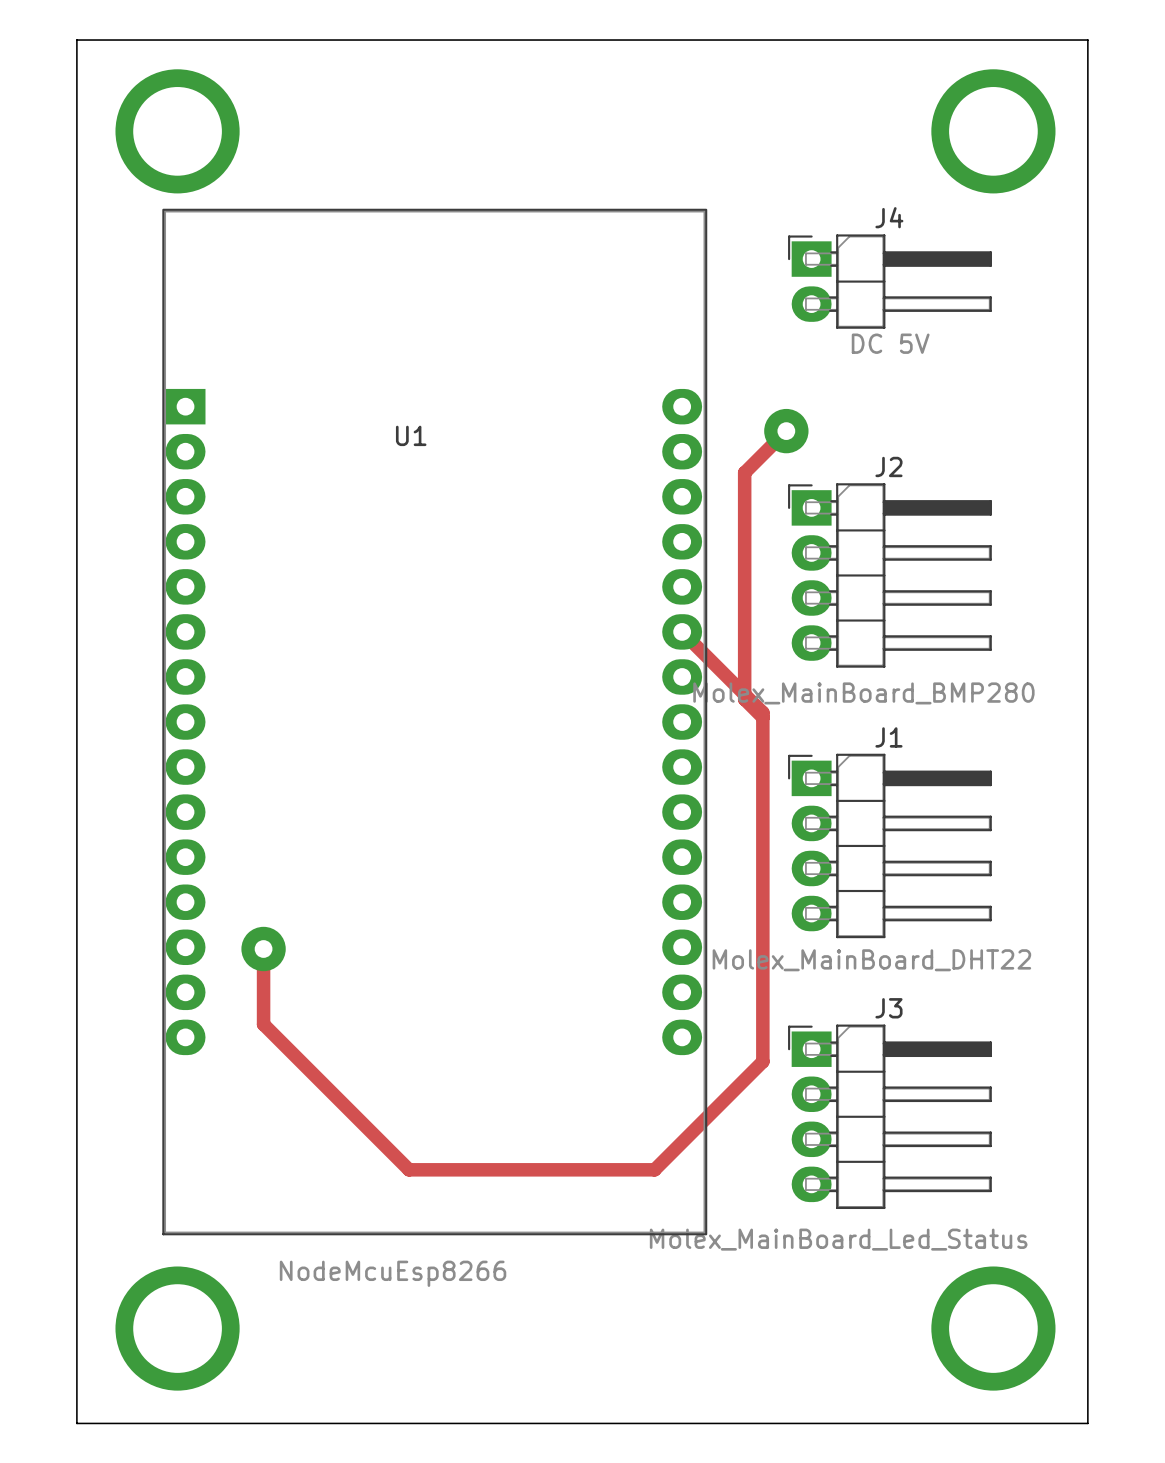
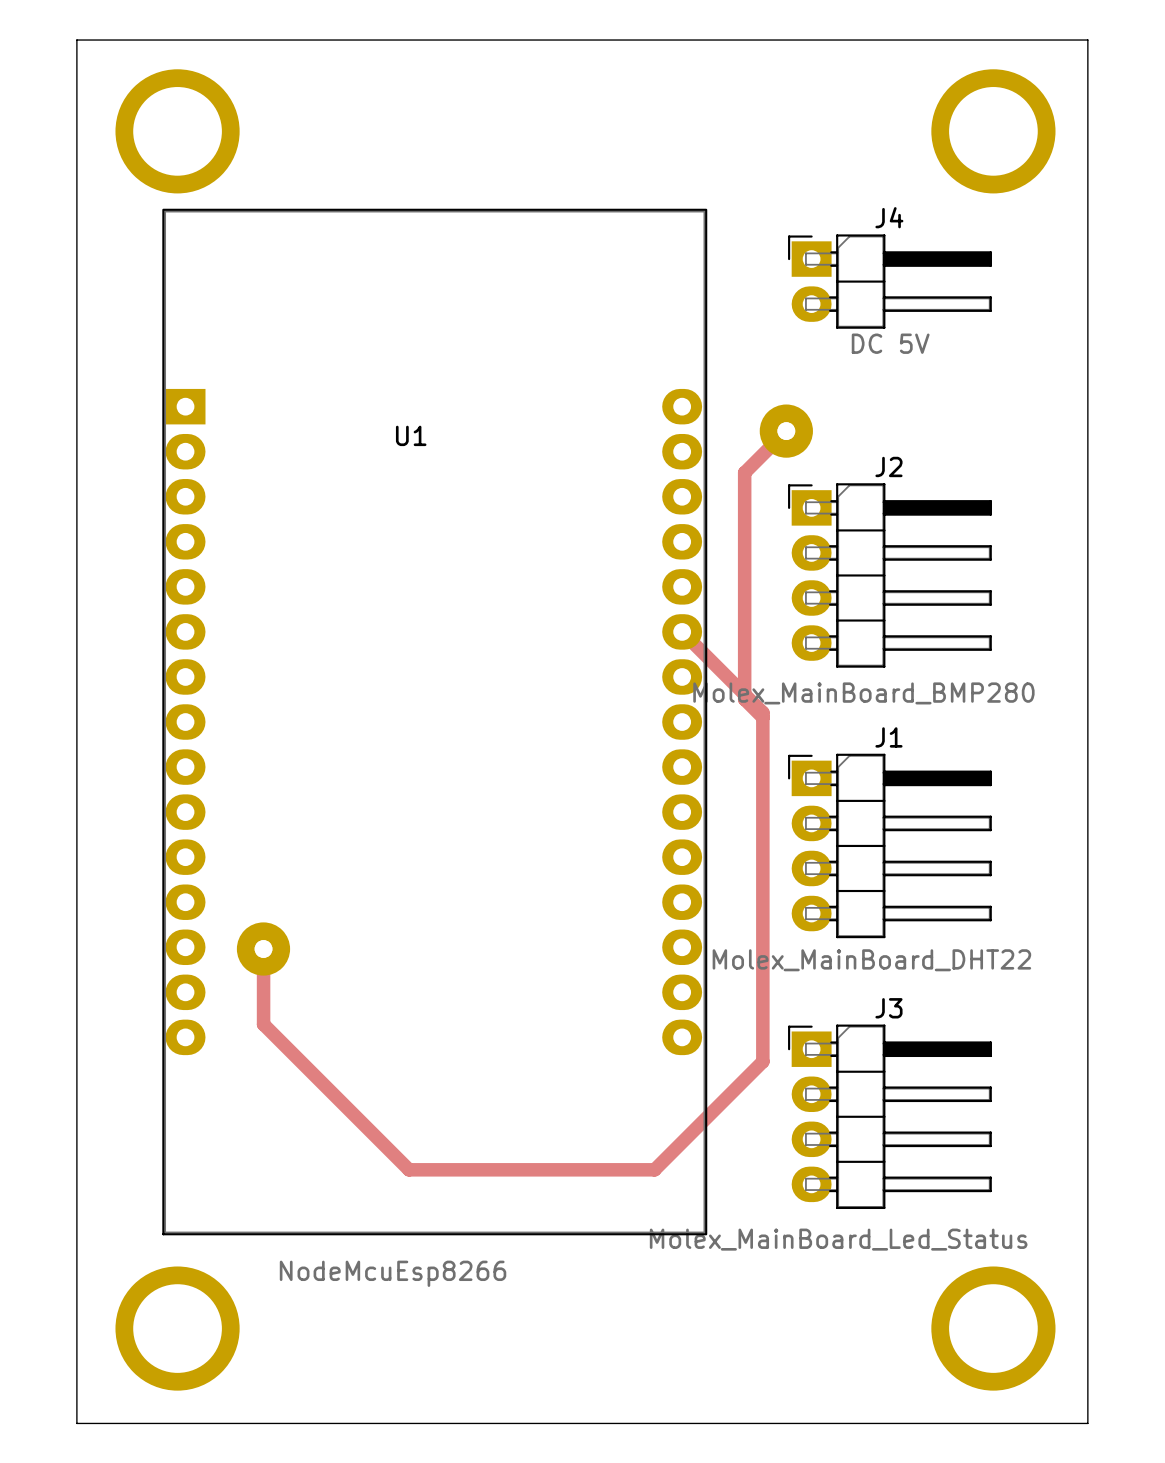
part: none -> (786, 431)
part: none -> (263, 949)

